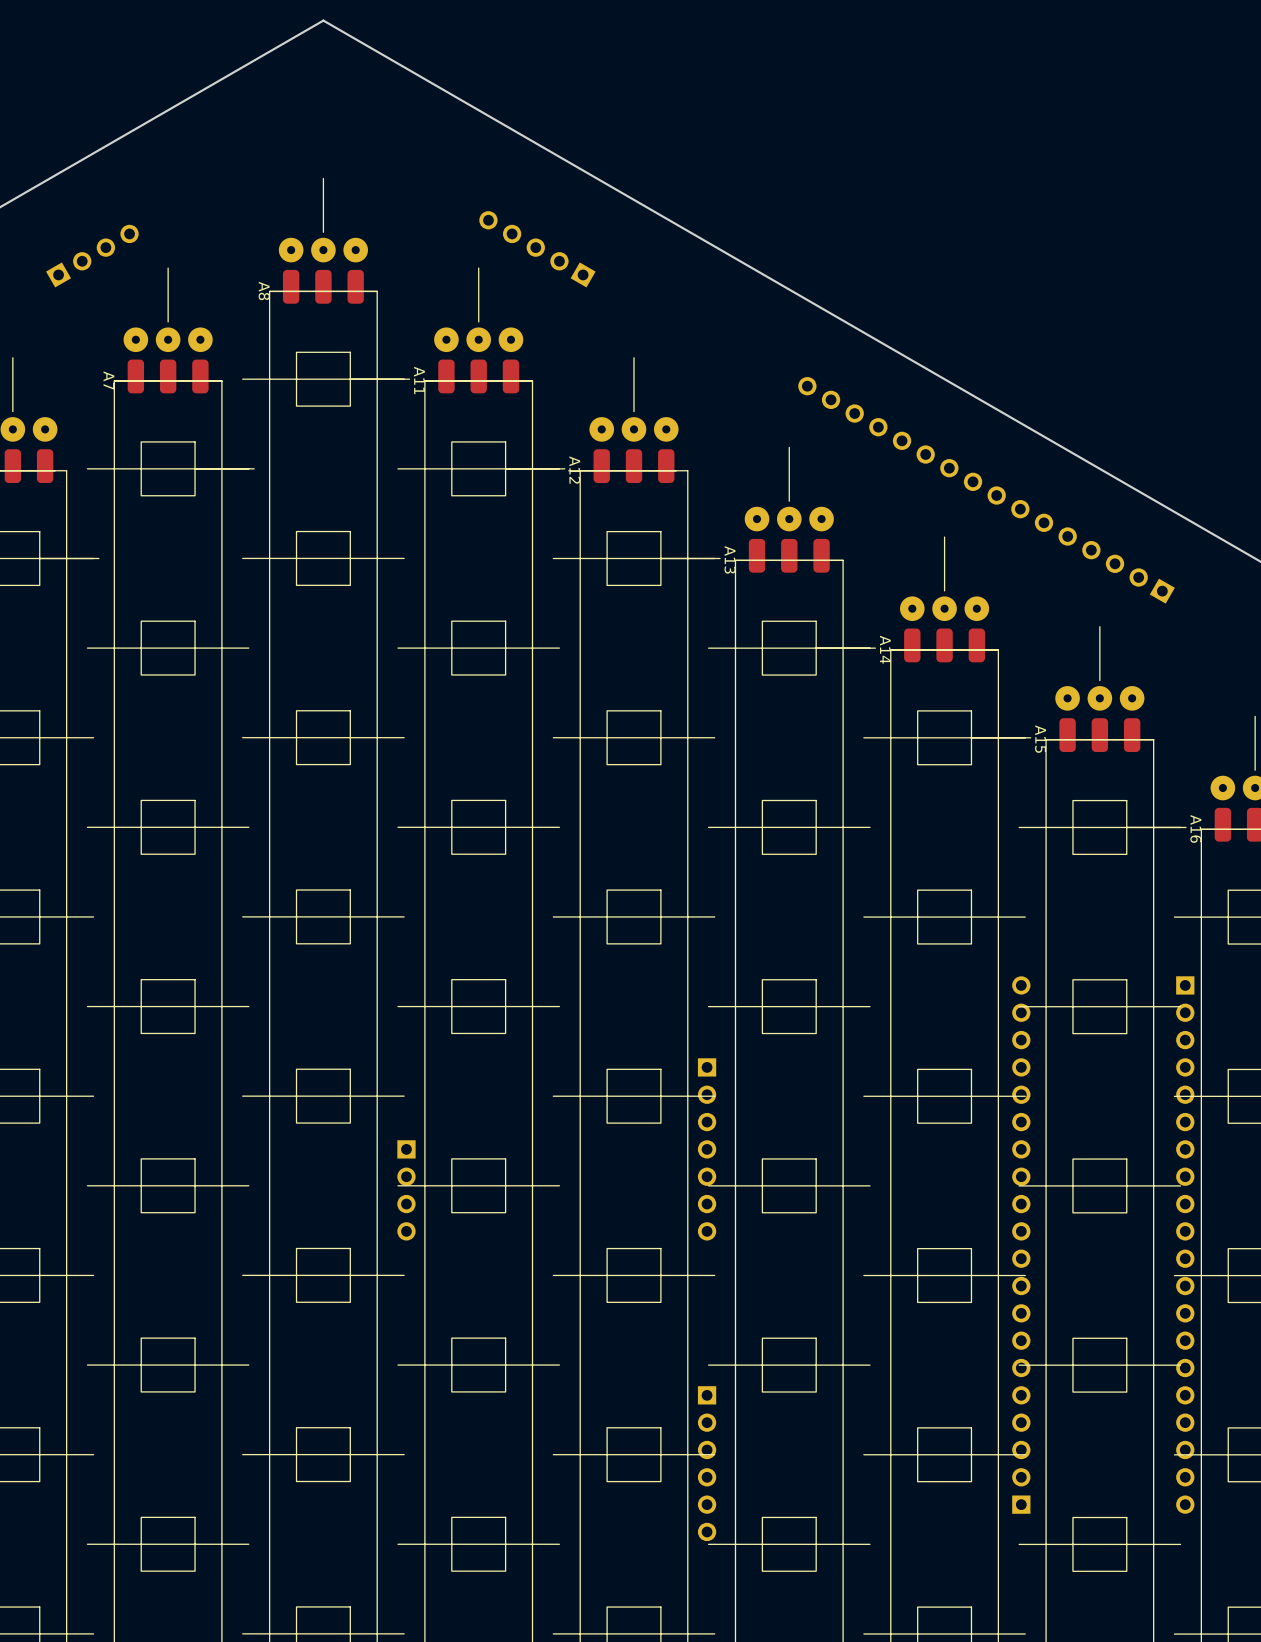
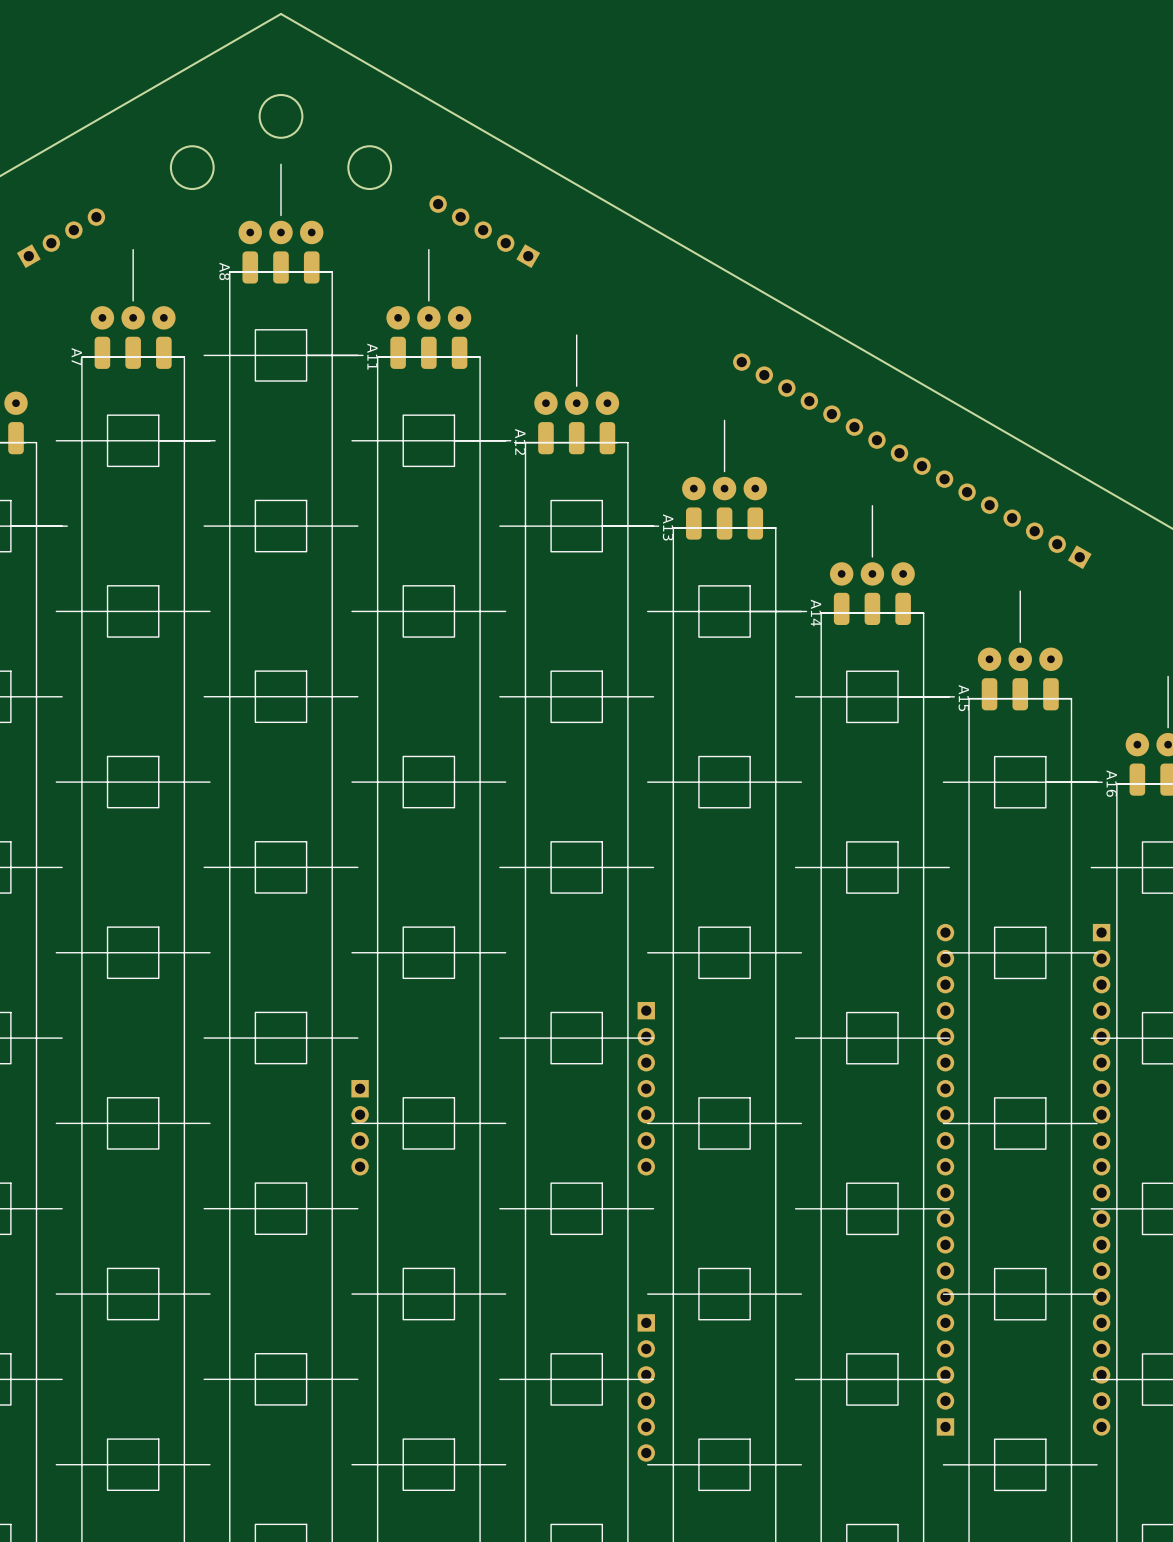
round board edge: none -> [258, 93, 304, 139]
round board edge: none -> [169, 145, 215, 191]
round board edge: none -> [347, 145, 393, 191]

